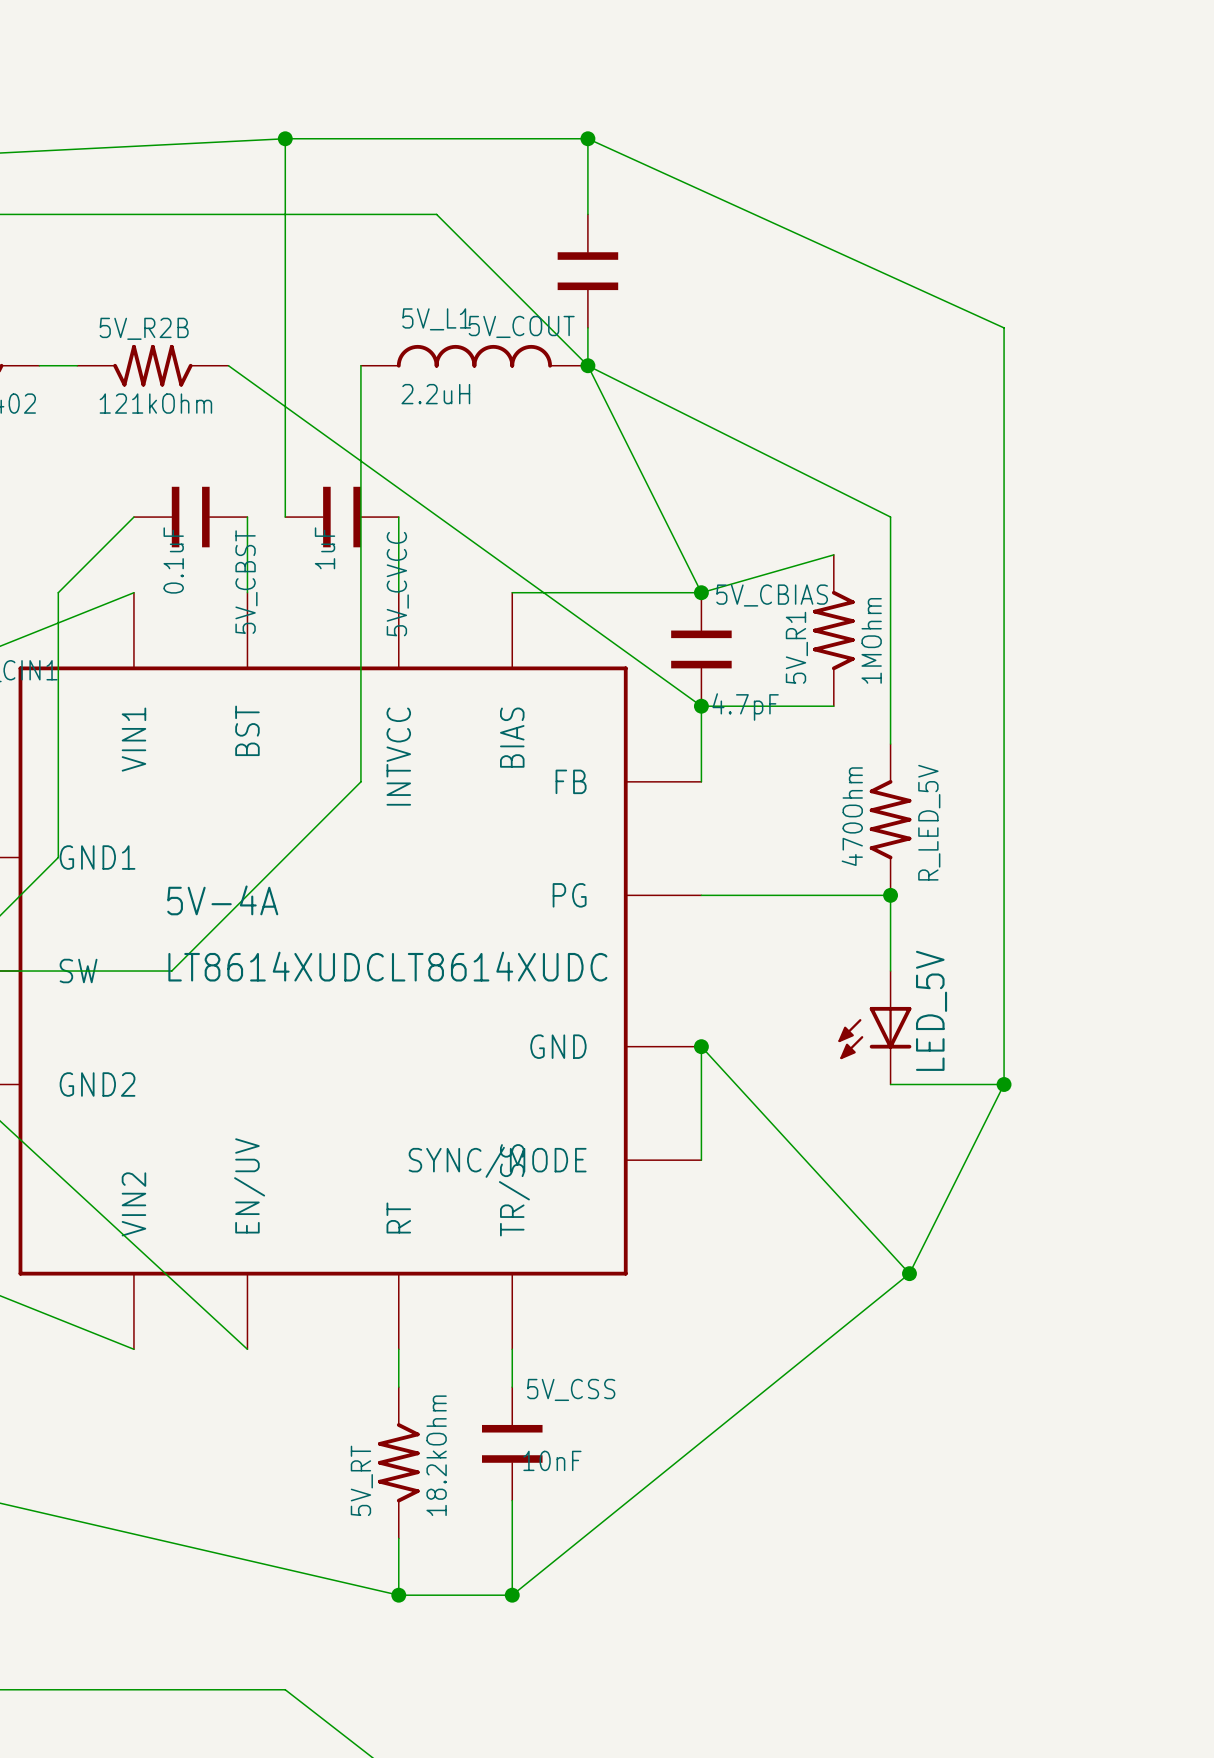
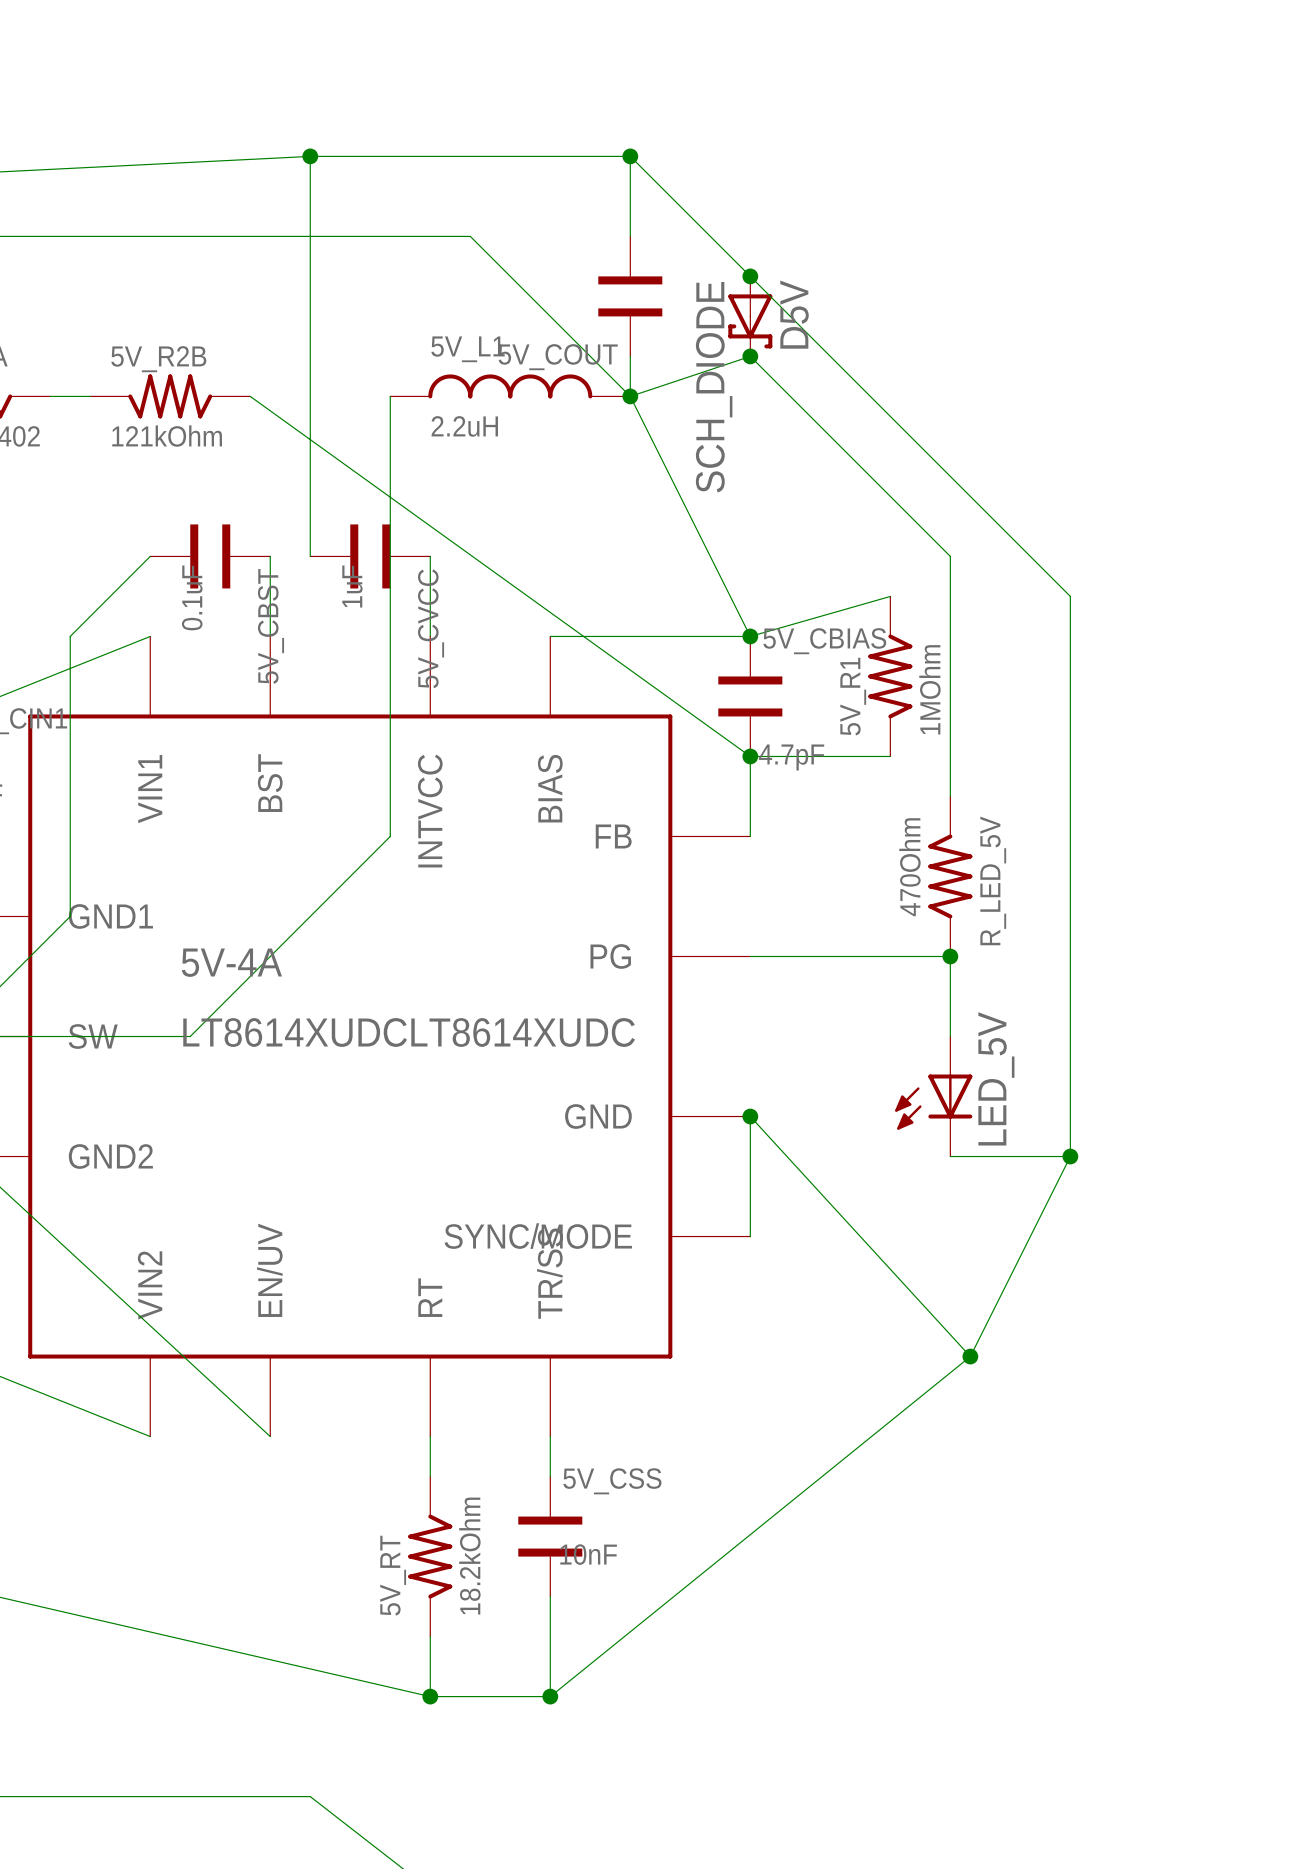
wire: (587, 138) (1004, 327) (1004, 554) -> (630, 156) (1070, 596)
junction: none -> (750, 276)
D5V: none -> SCH_DIODE (750, 316)
junction: none -> (750, 356)
wire: (587, 365) (890, 517) -> (630, 396) (750, 356) (950, 556)

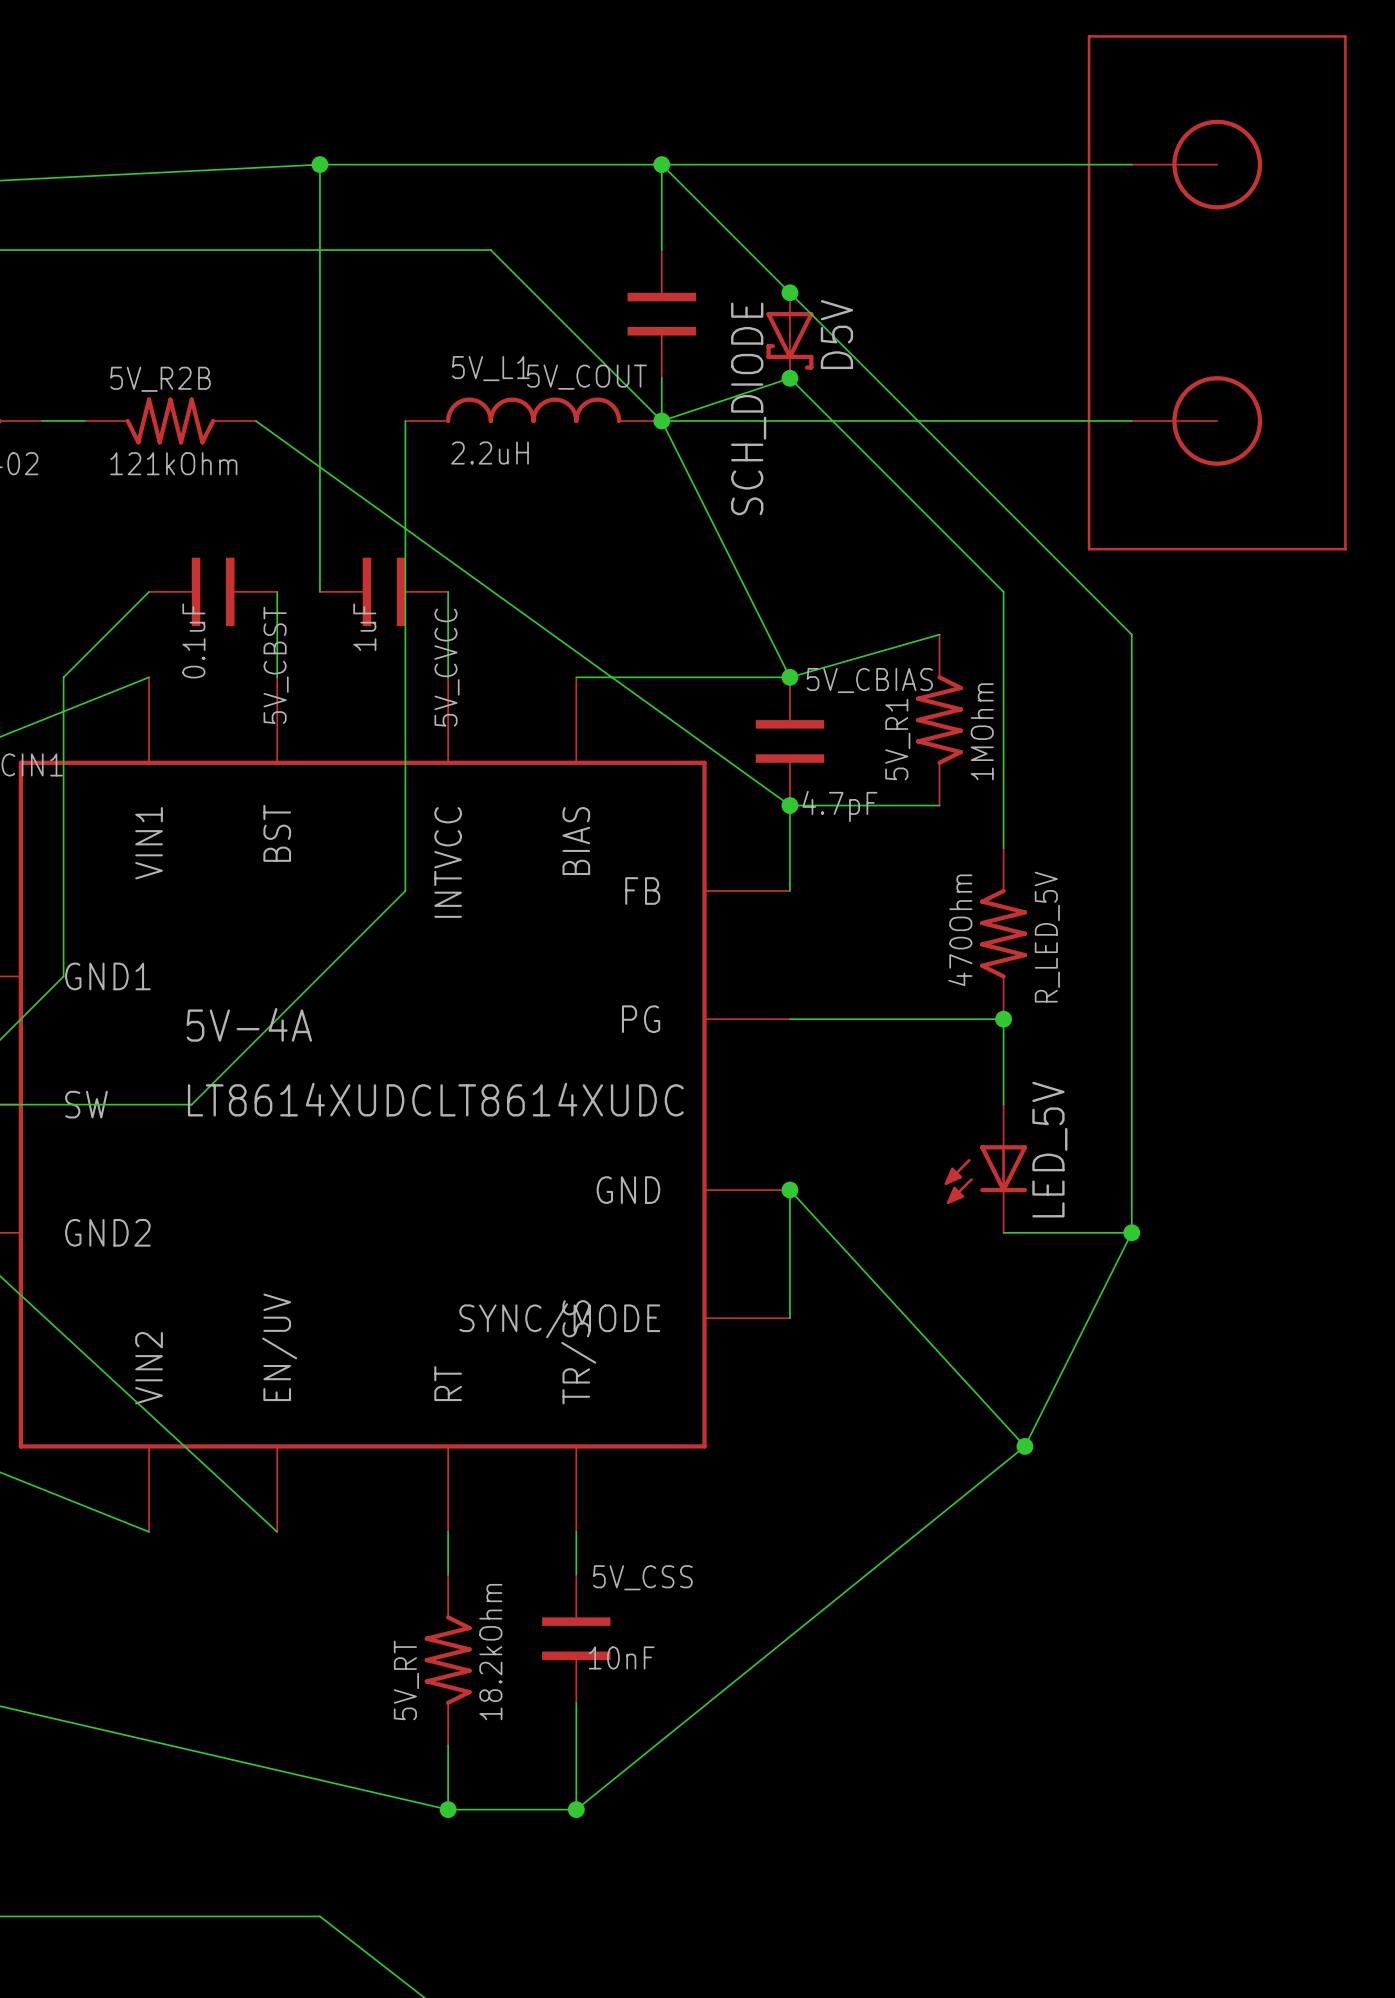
line: none -> (1089, 36) (1345, 36) (1345, 549) (1089, 549) (1089, 36)
wire: none -> (661, 164) (1131, 164)
part: none -> (1196, 164)
wire: none -> (661, 420) (1131, 420)
part: none -> (1196, 420)

